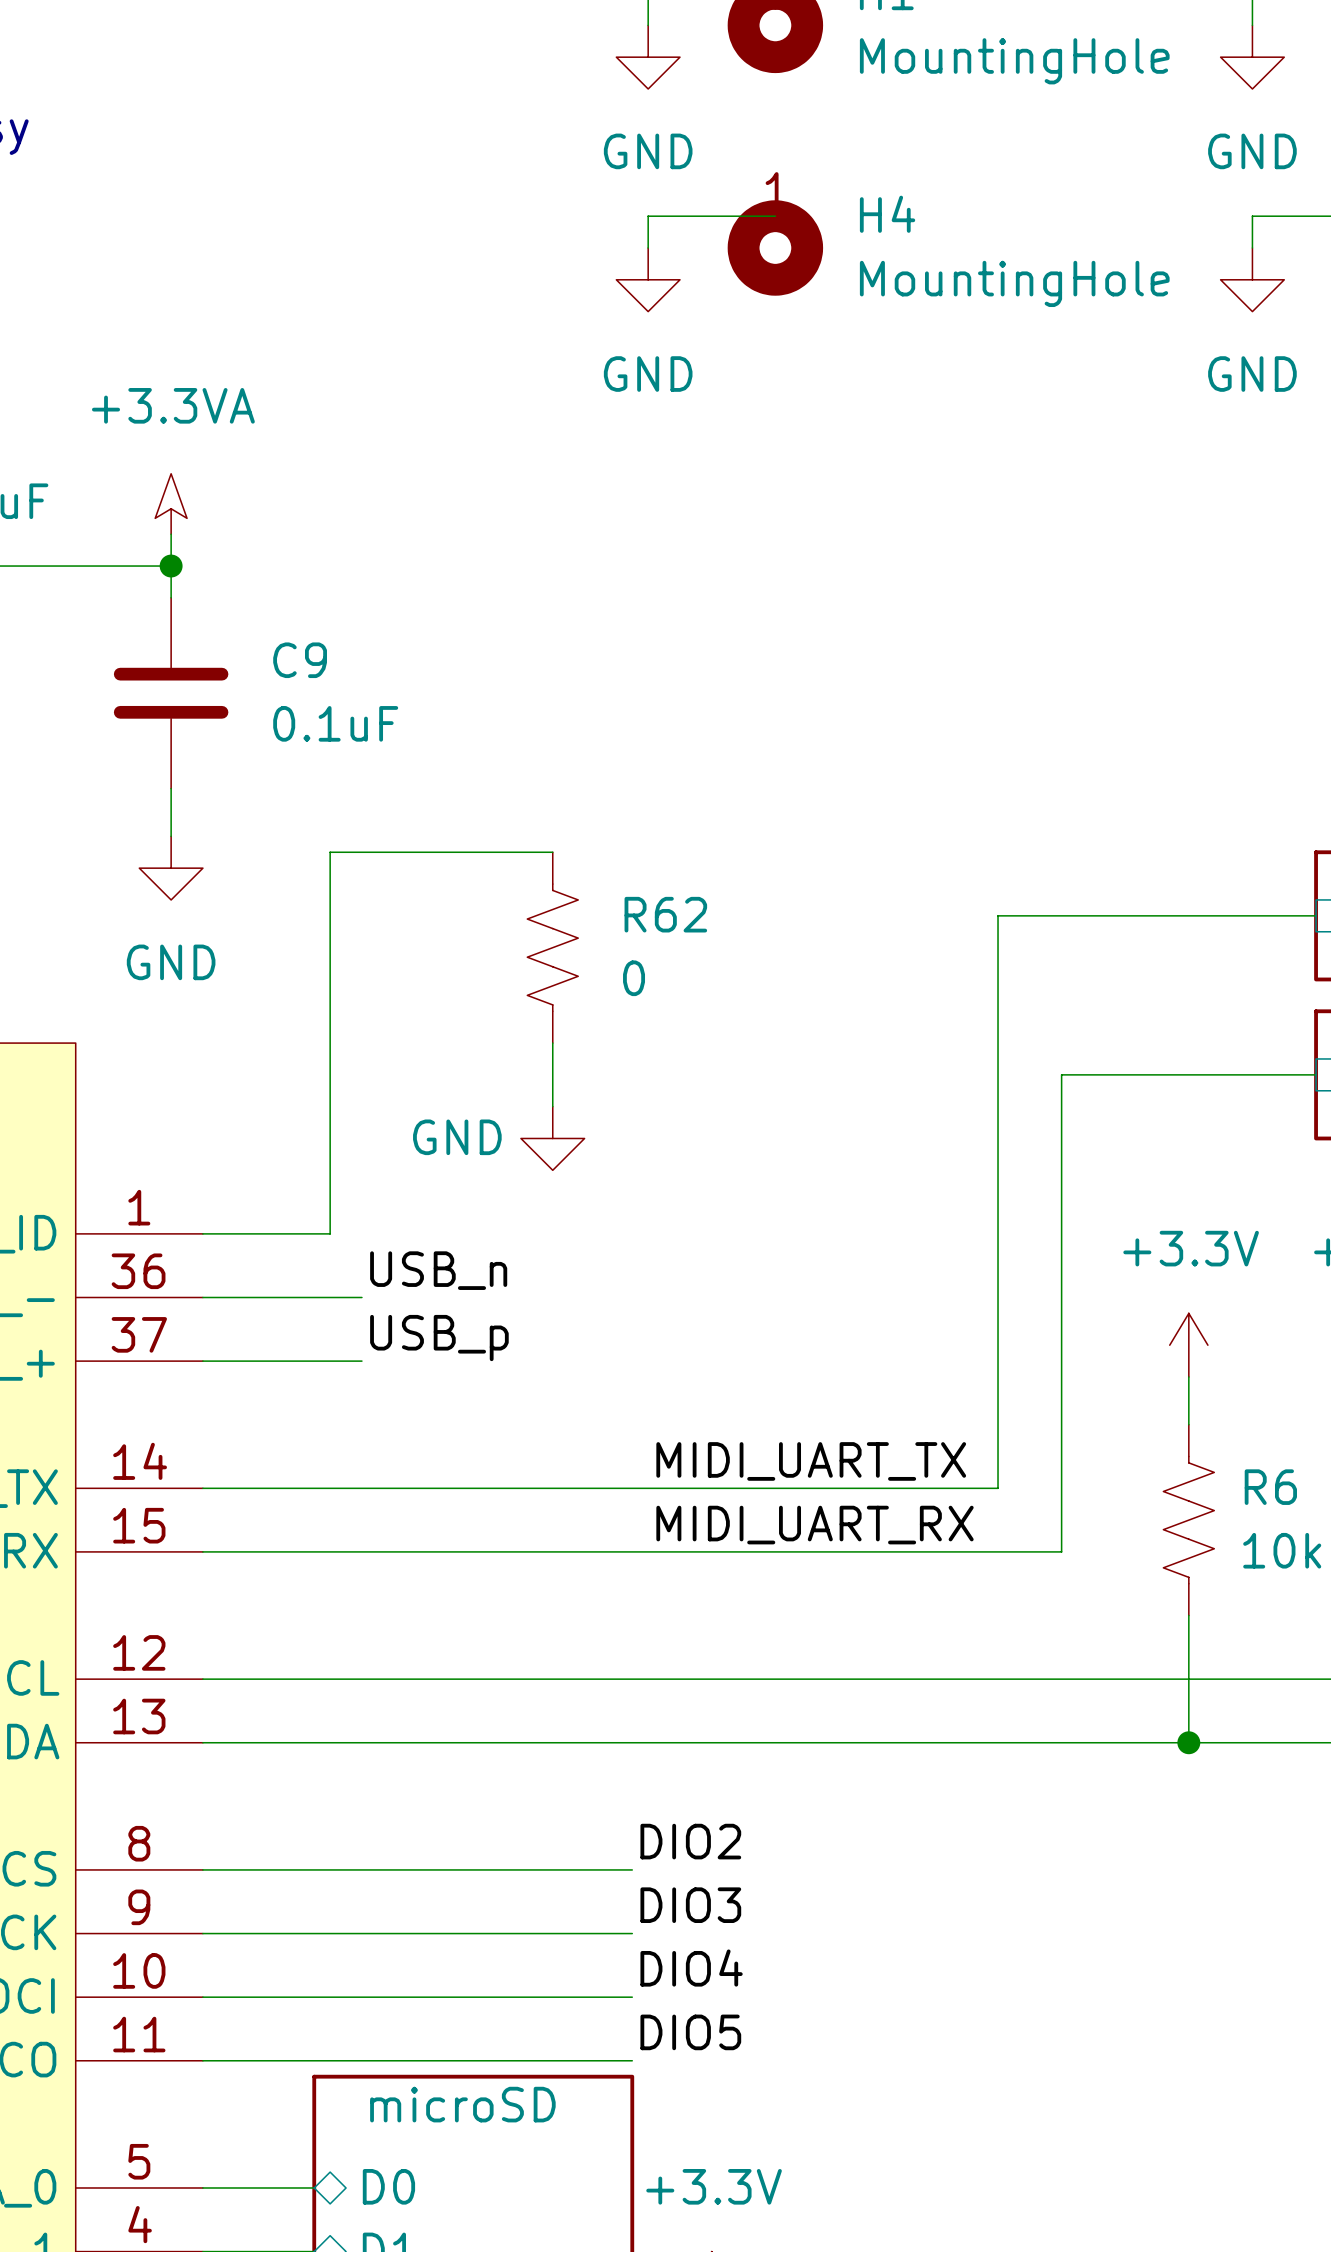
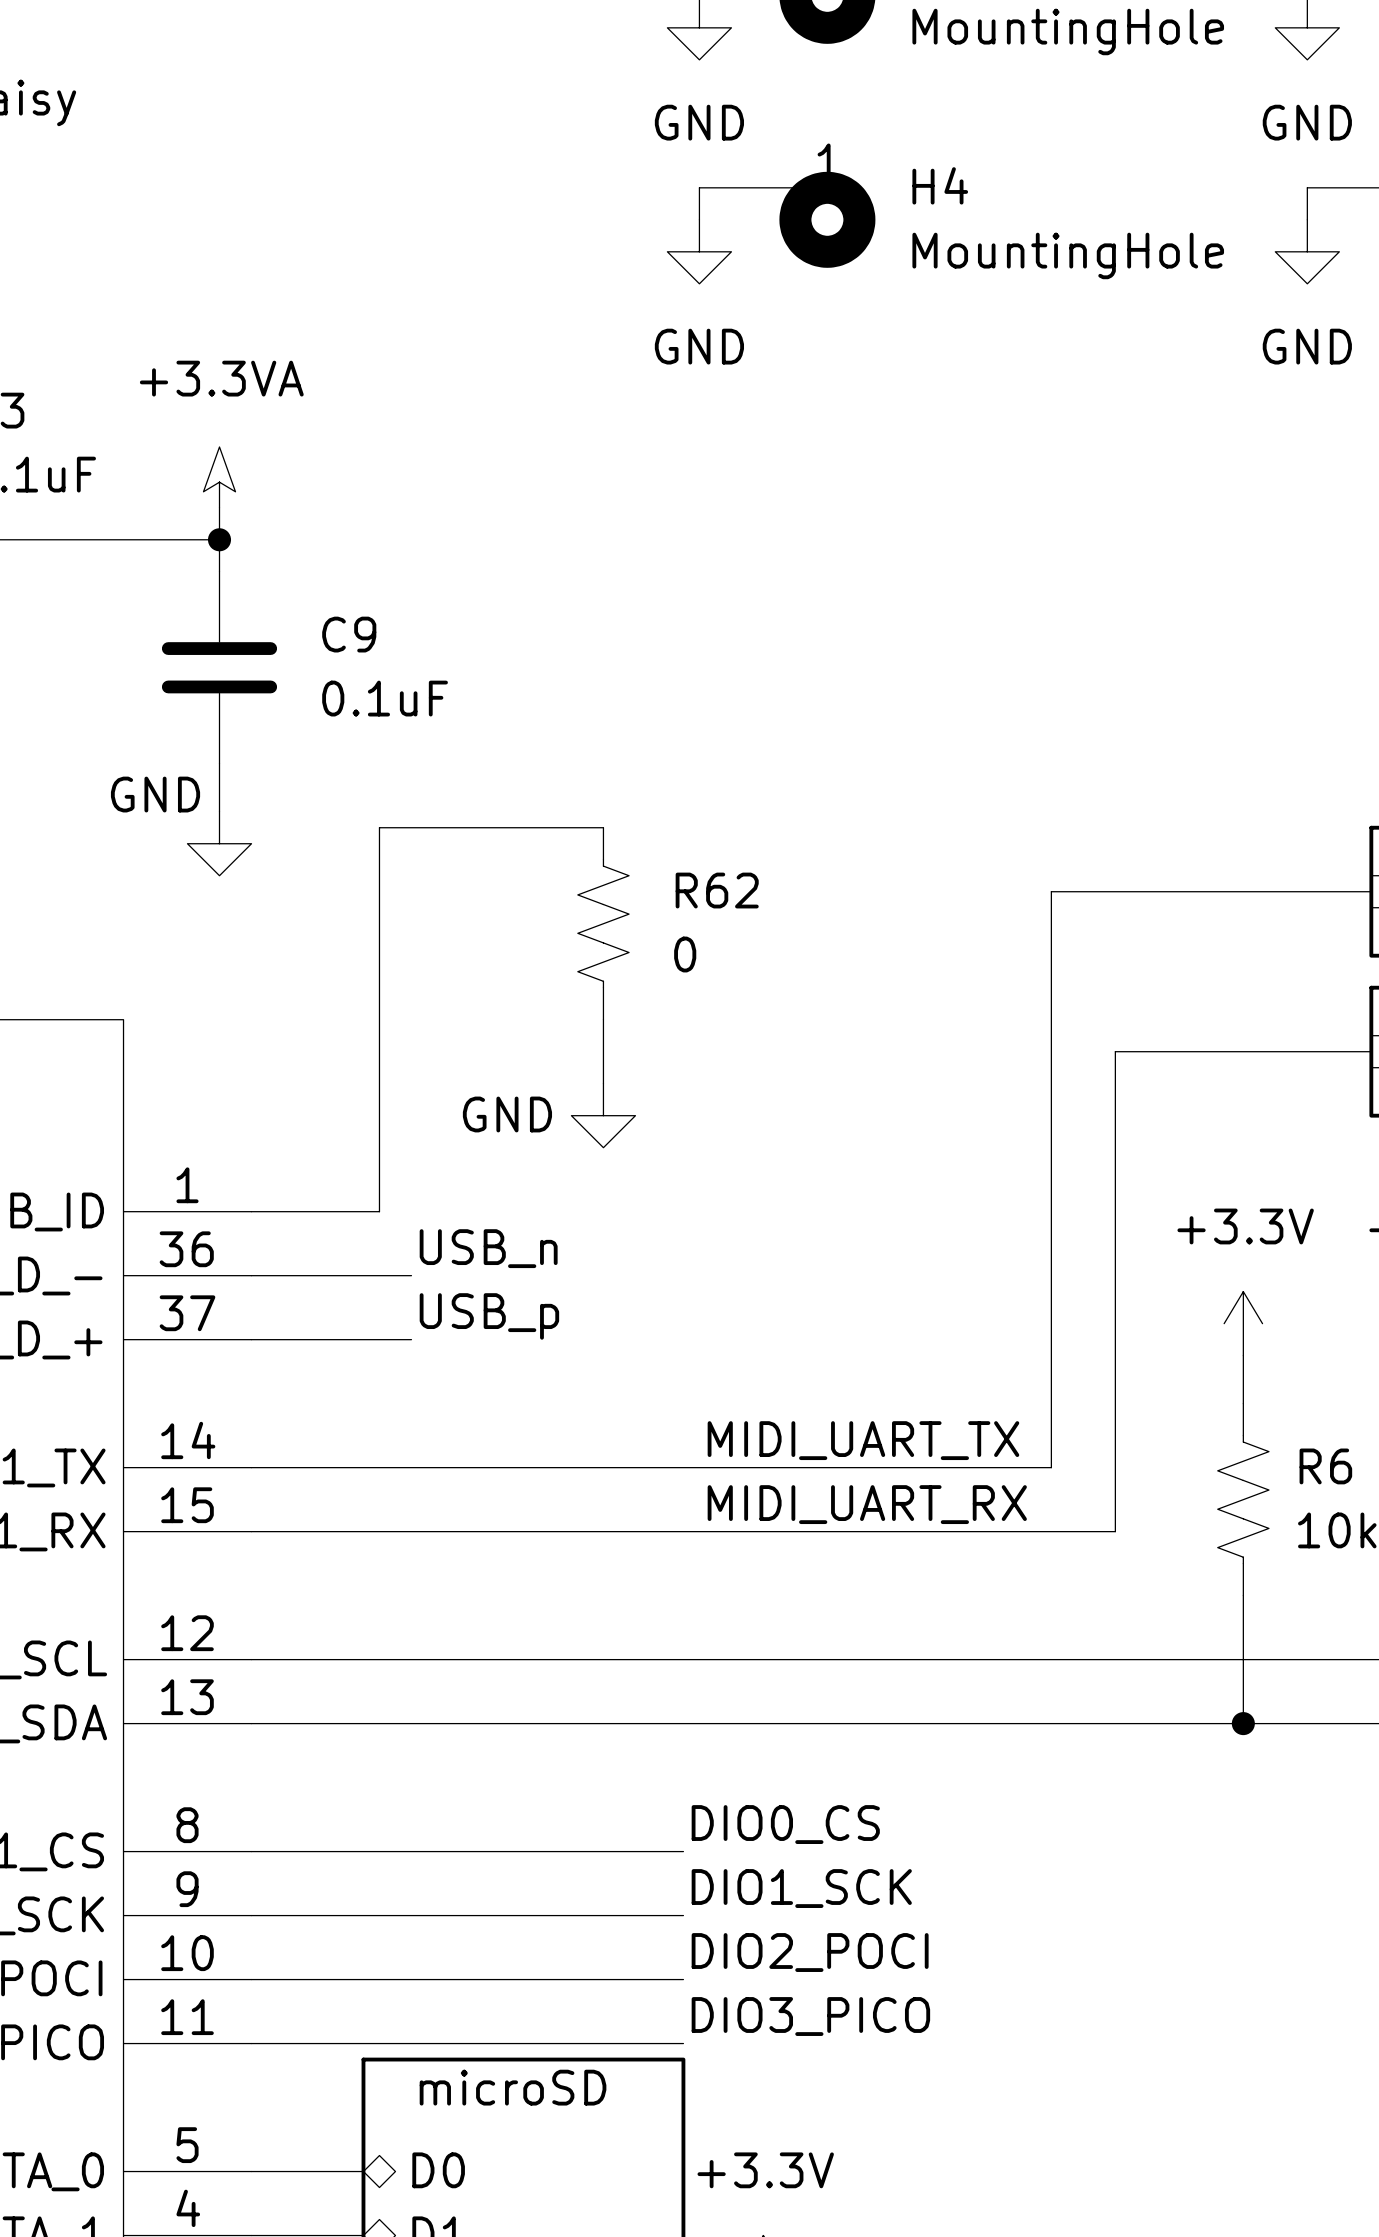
power symbol text position: GND (171, 962) -> GND (155, 794)
label: DIO2 (690, 1841) -> DIO0_CS (785, 1824)
label: DIO3 (690, 1905) -> DIO1_SCK (801, 1888)
label: DIO4 (691, 1968) -> DIO2_POCI (810, 1952)
label: DIO5 (690, 2032) -> DIO3_PICO (810, 2016)

